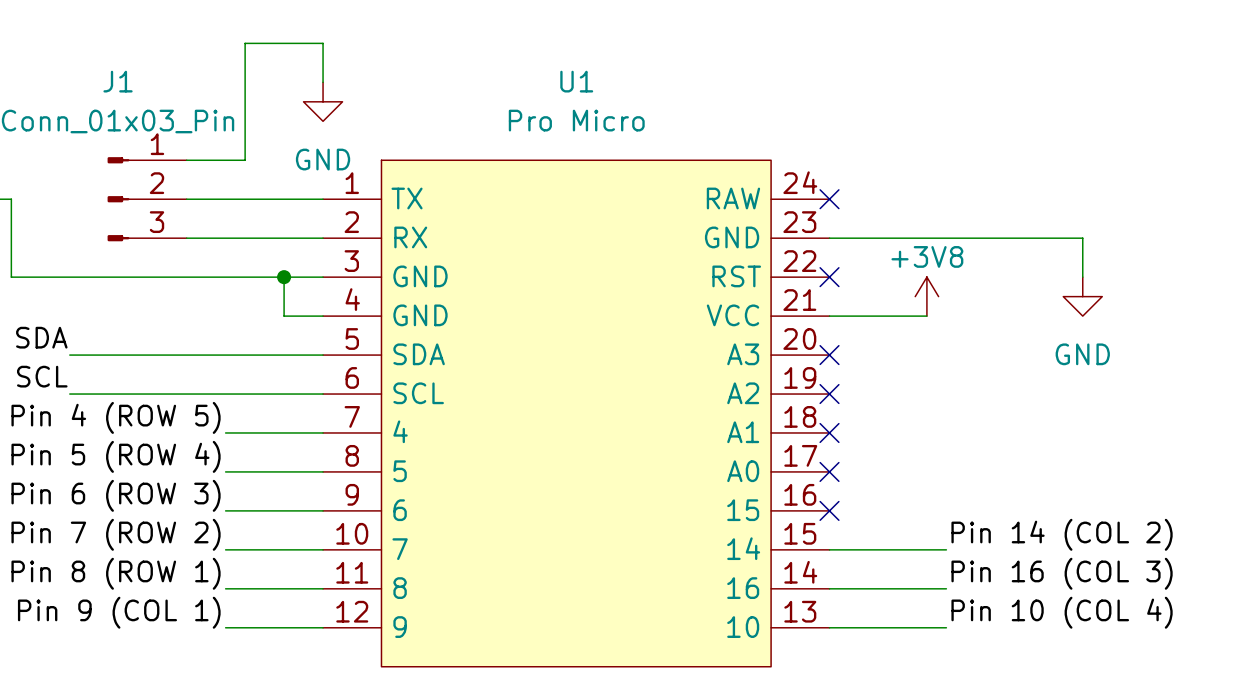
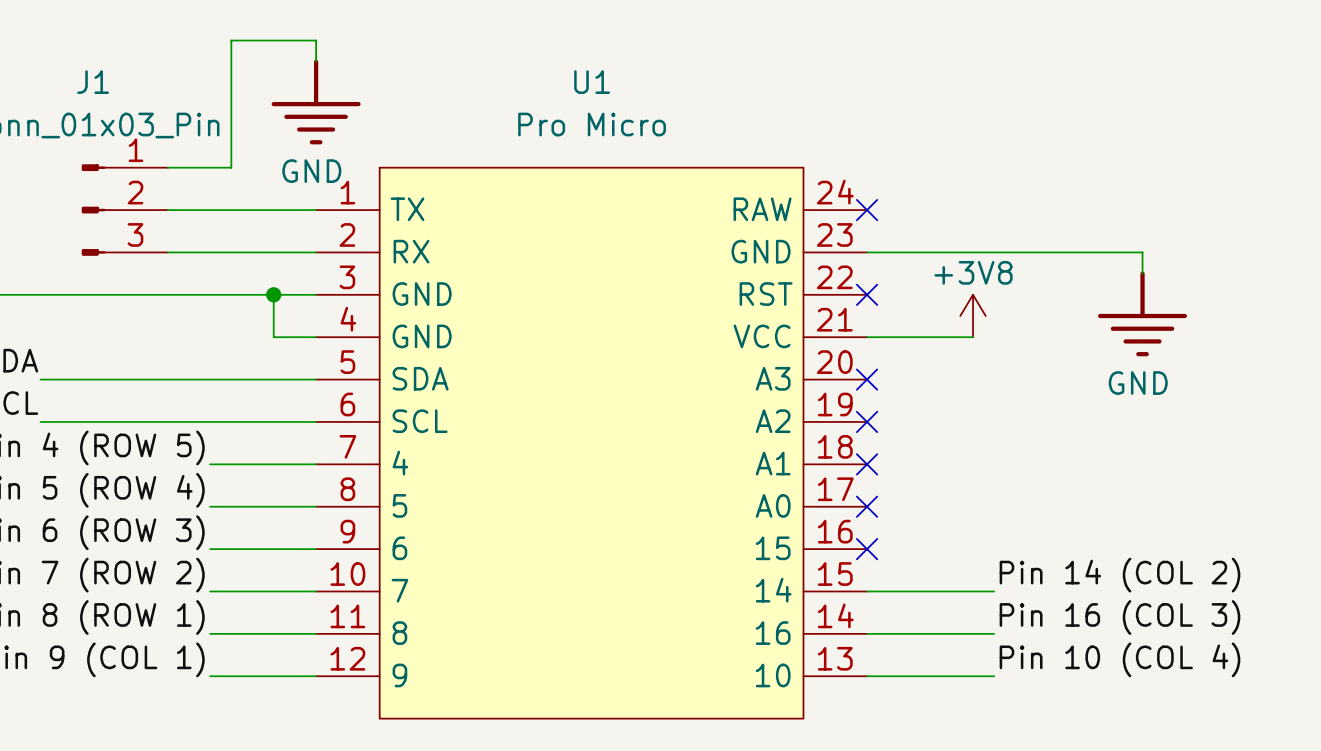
power symbol shape: [303, 82, 343, 122] -> [271, 59, 361, 145]
power symbol shape: [1063, 277, 1103, 317] -> [1098, 271, 1188, 357]

